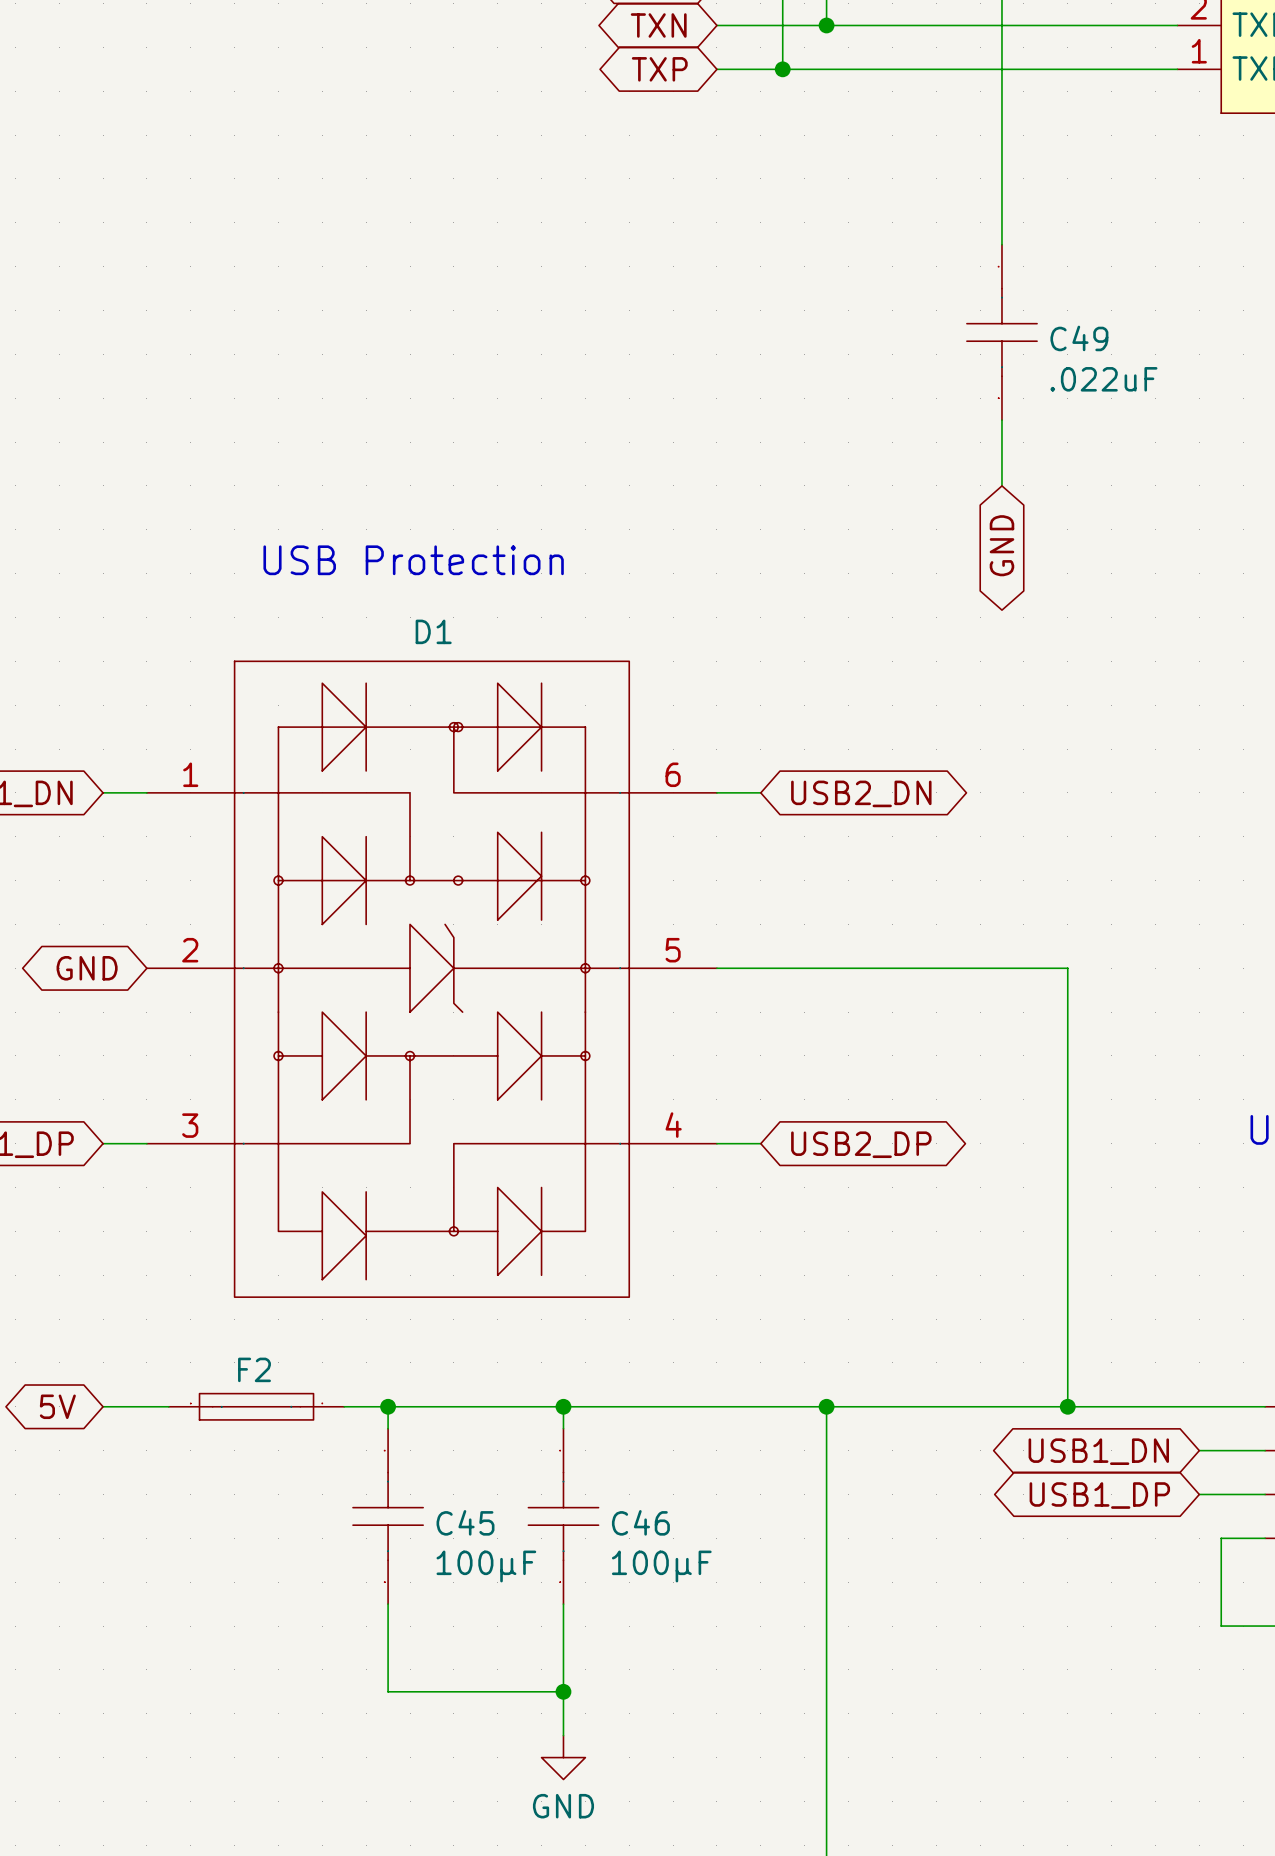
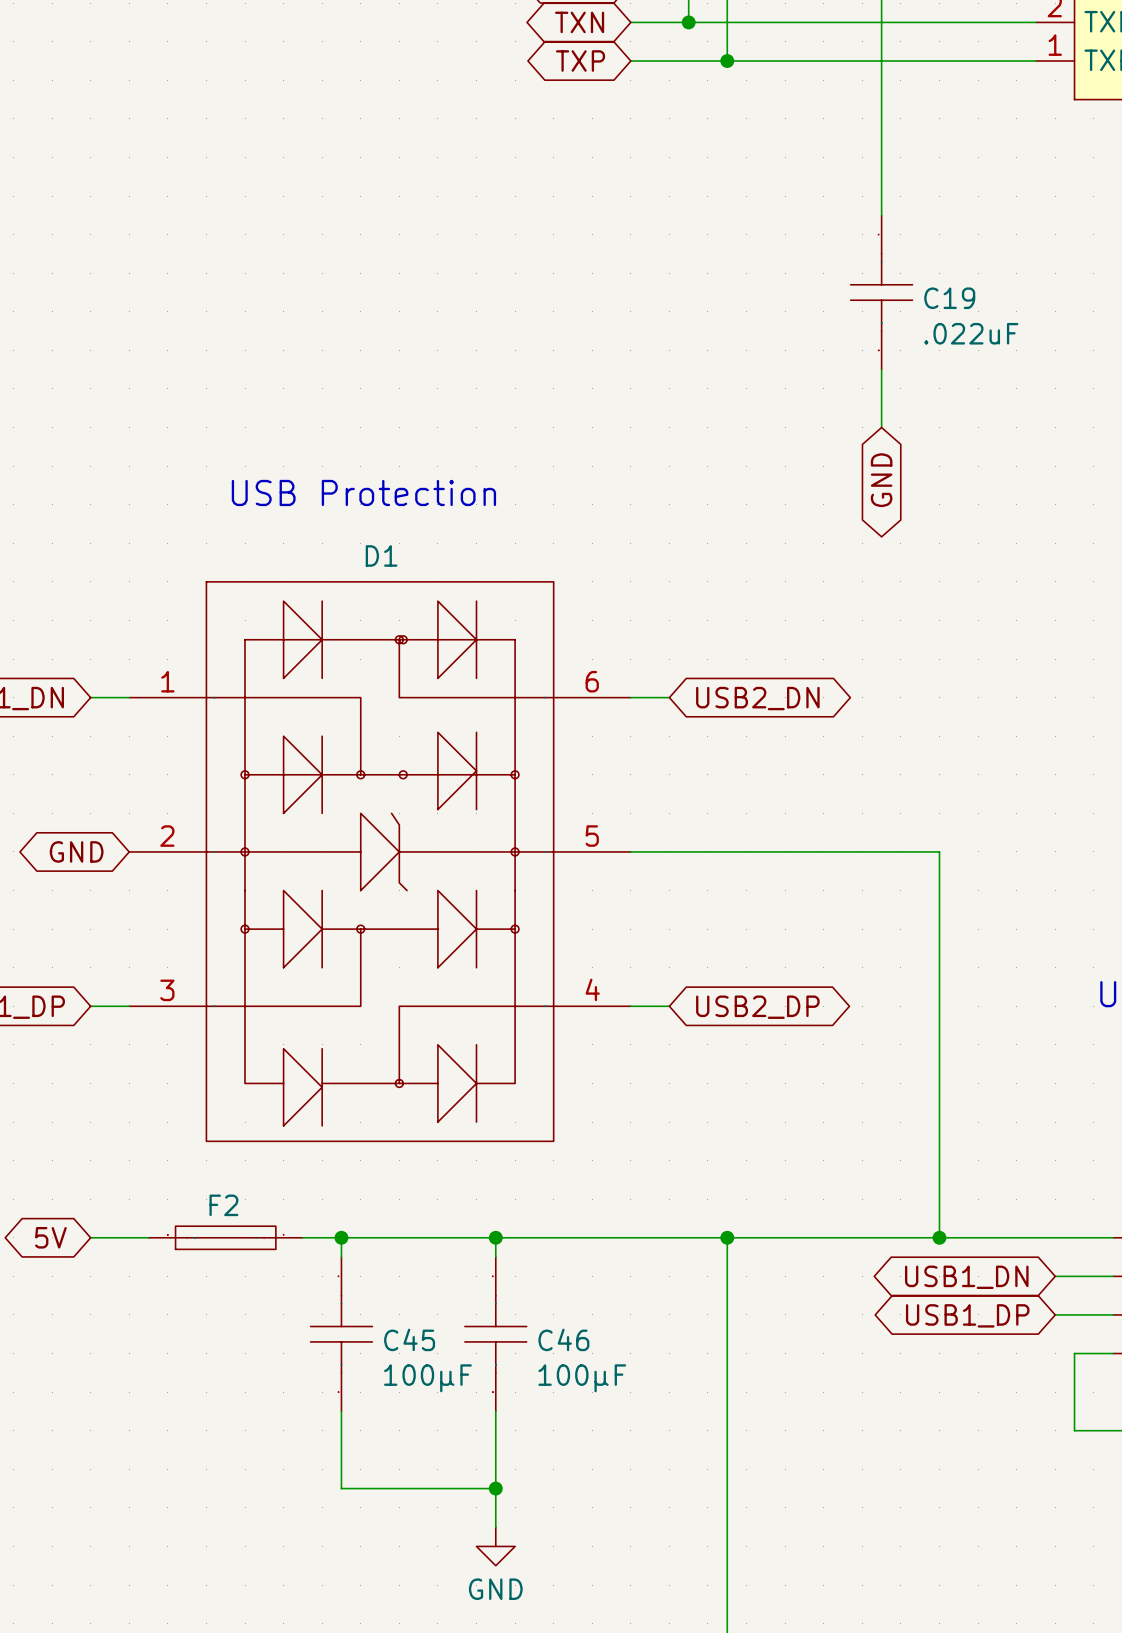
wire: (782, 25) (782, 69) -> (727, 22) (727, 61)
junction: none -> (688, 22)
junction: (826, 25) -> none
junction: (782, 69) -> none
junction: none -> (727, 61)
C49 name: C49 (1079, 338) -> C19 (949, 298)

